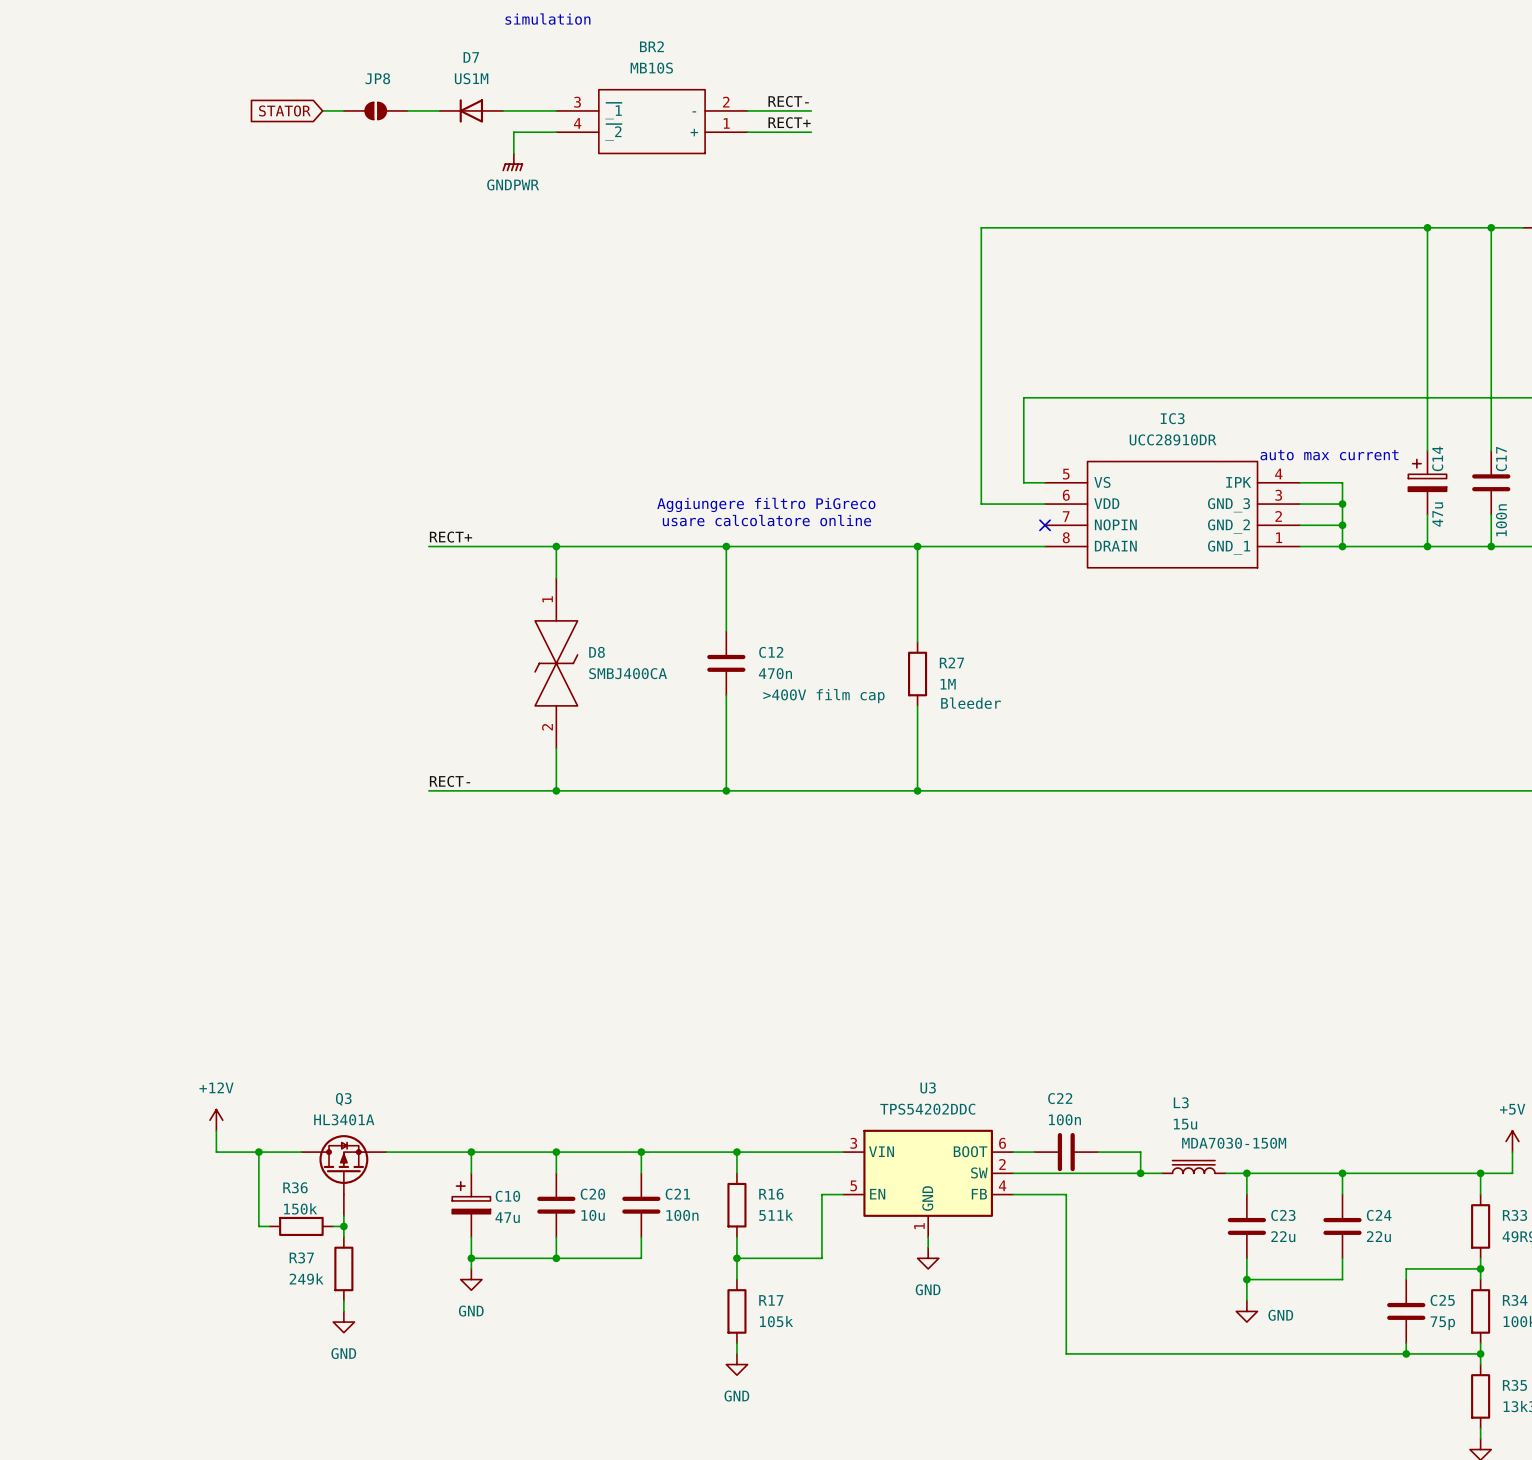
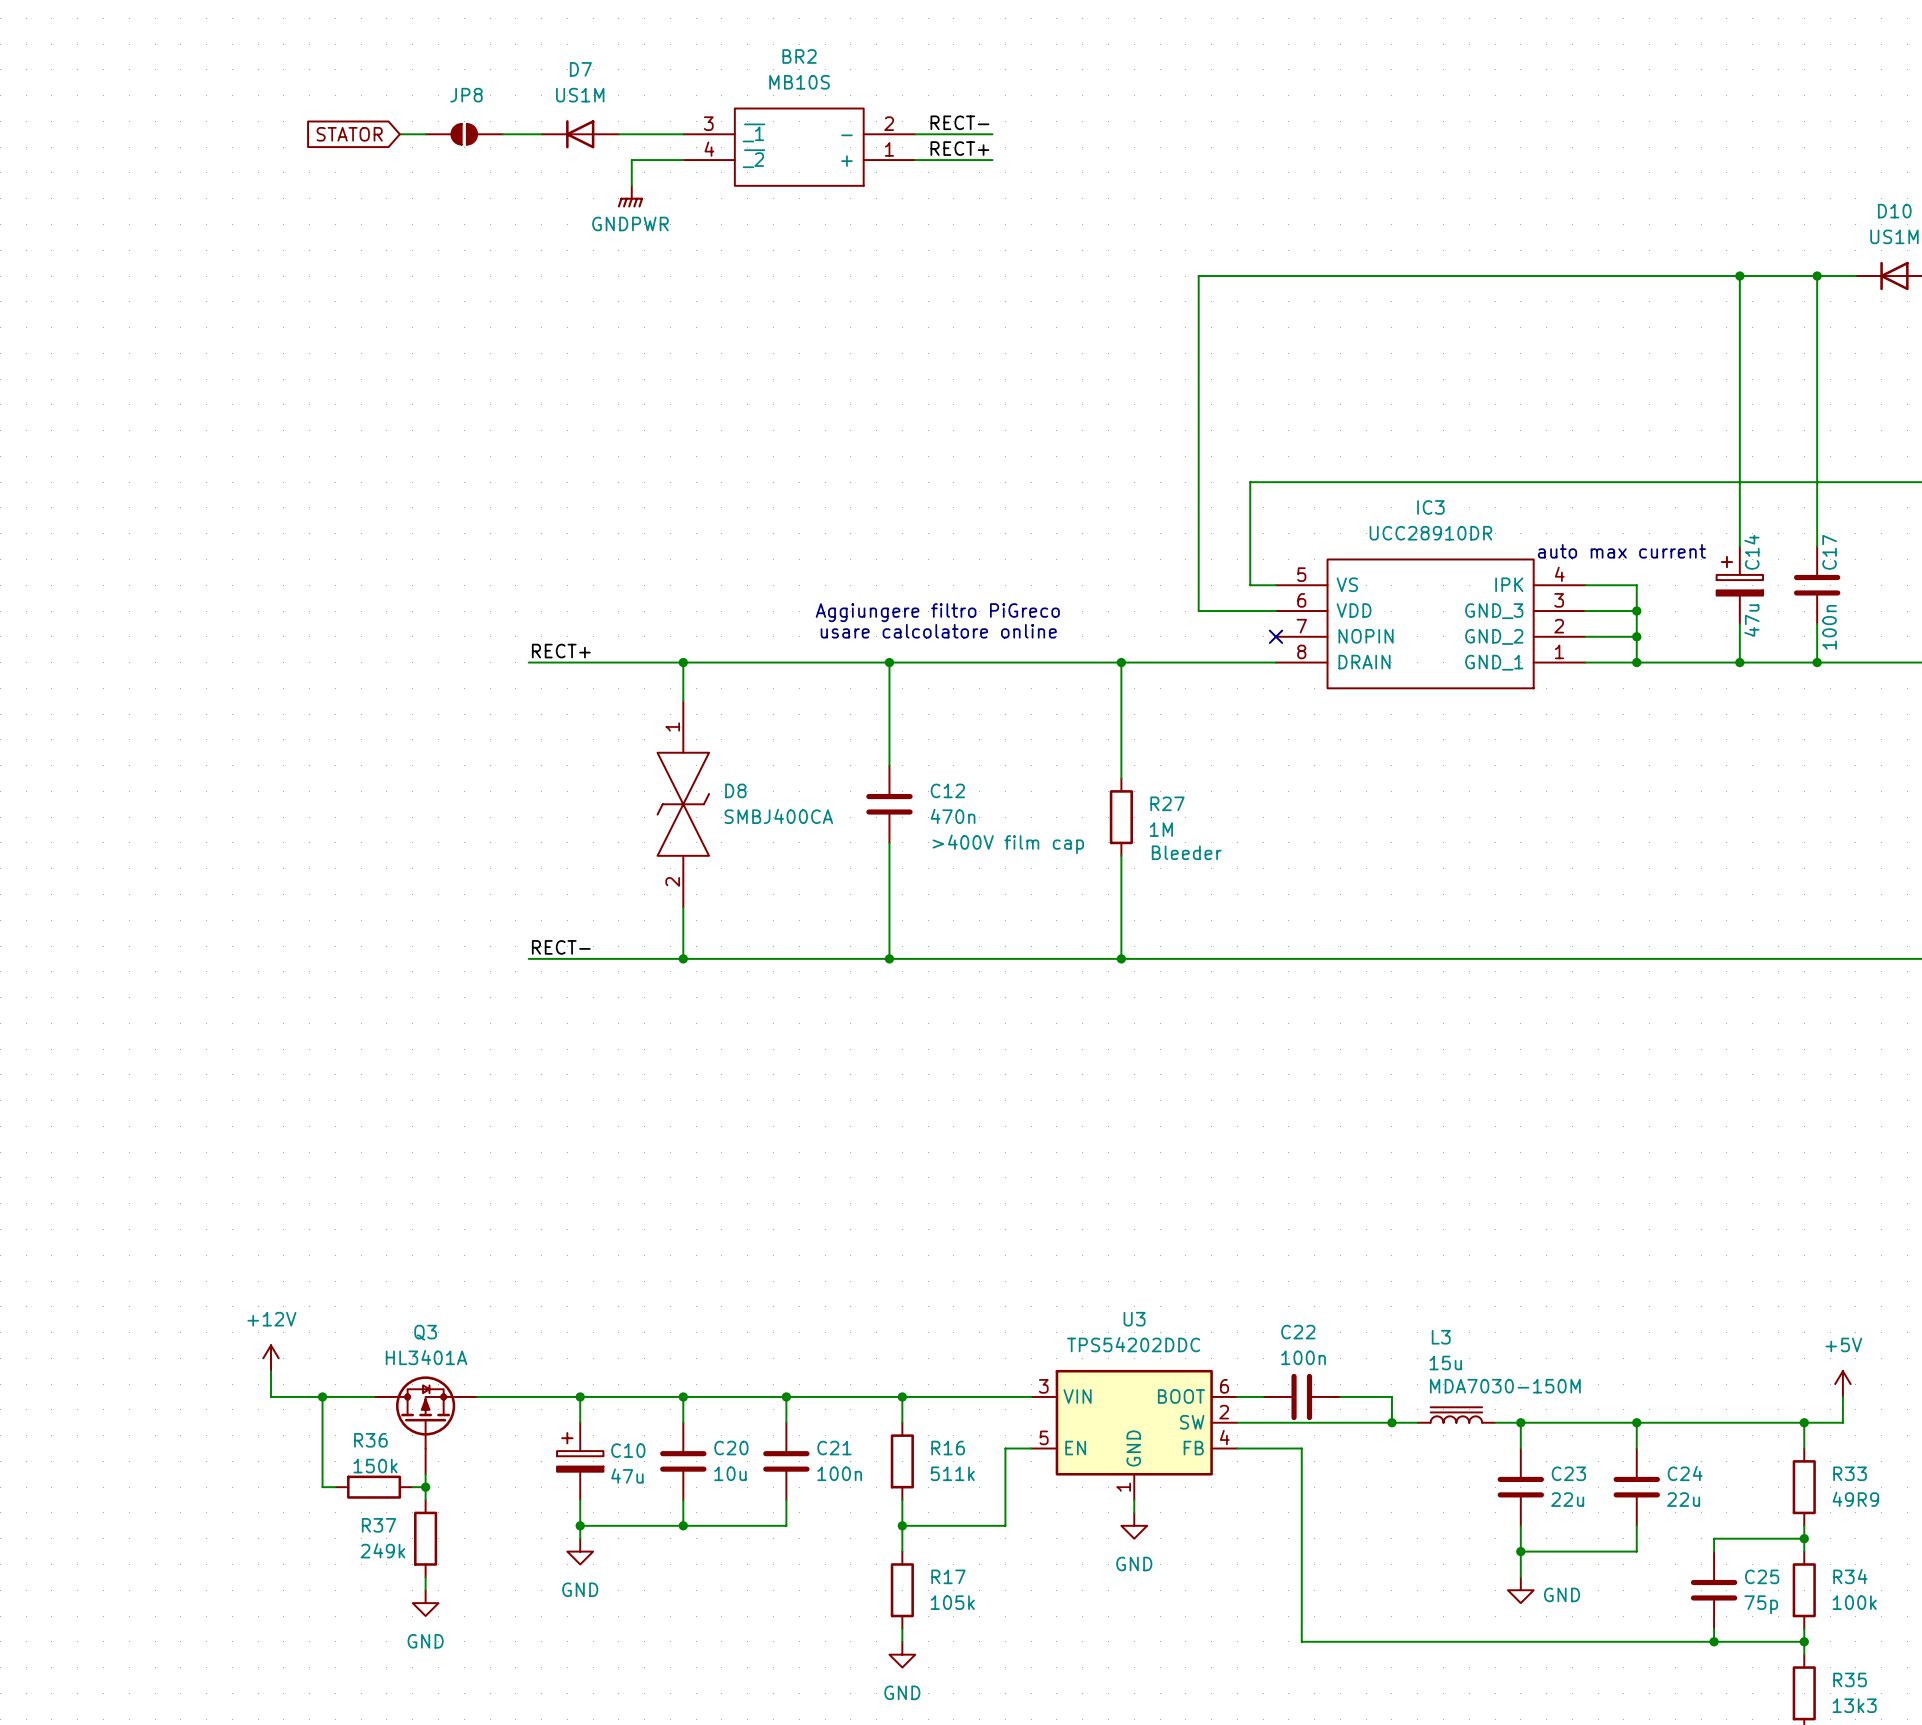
text: simulation (547, 19) -> none

